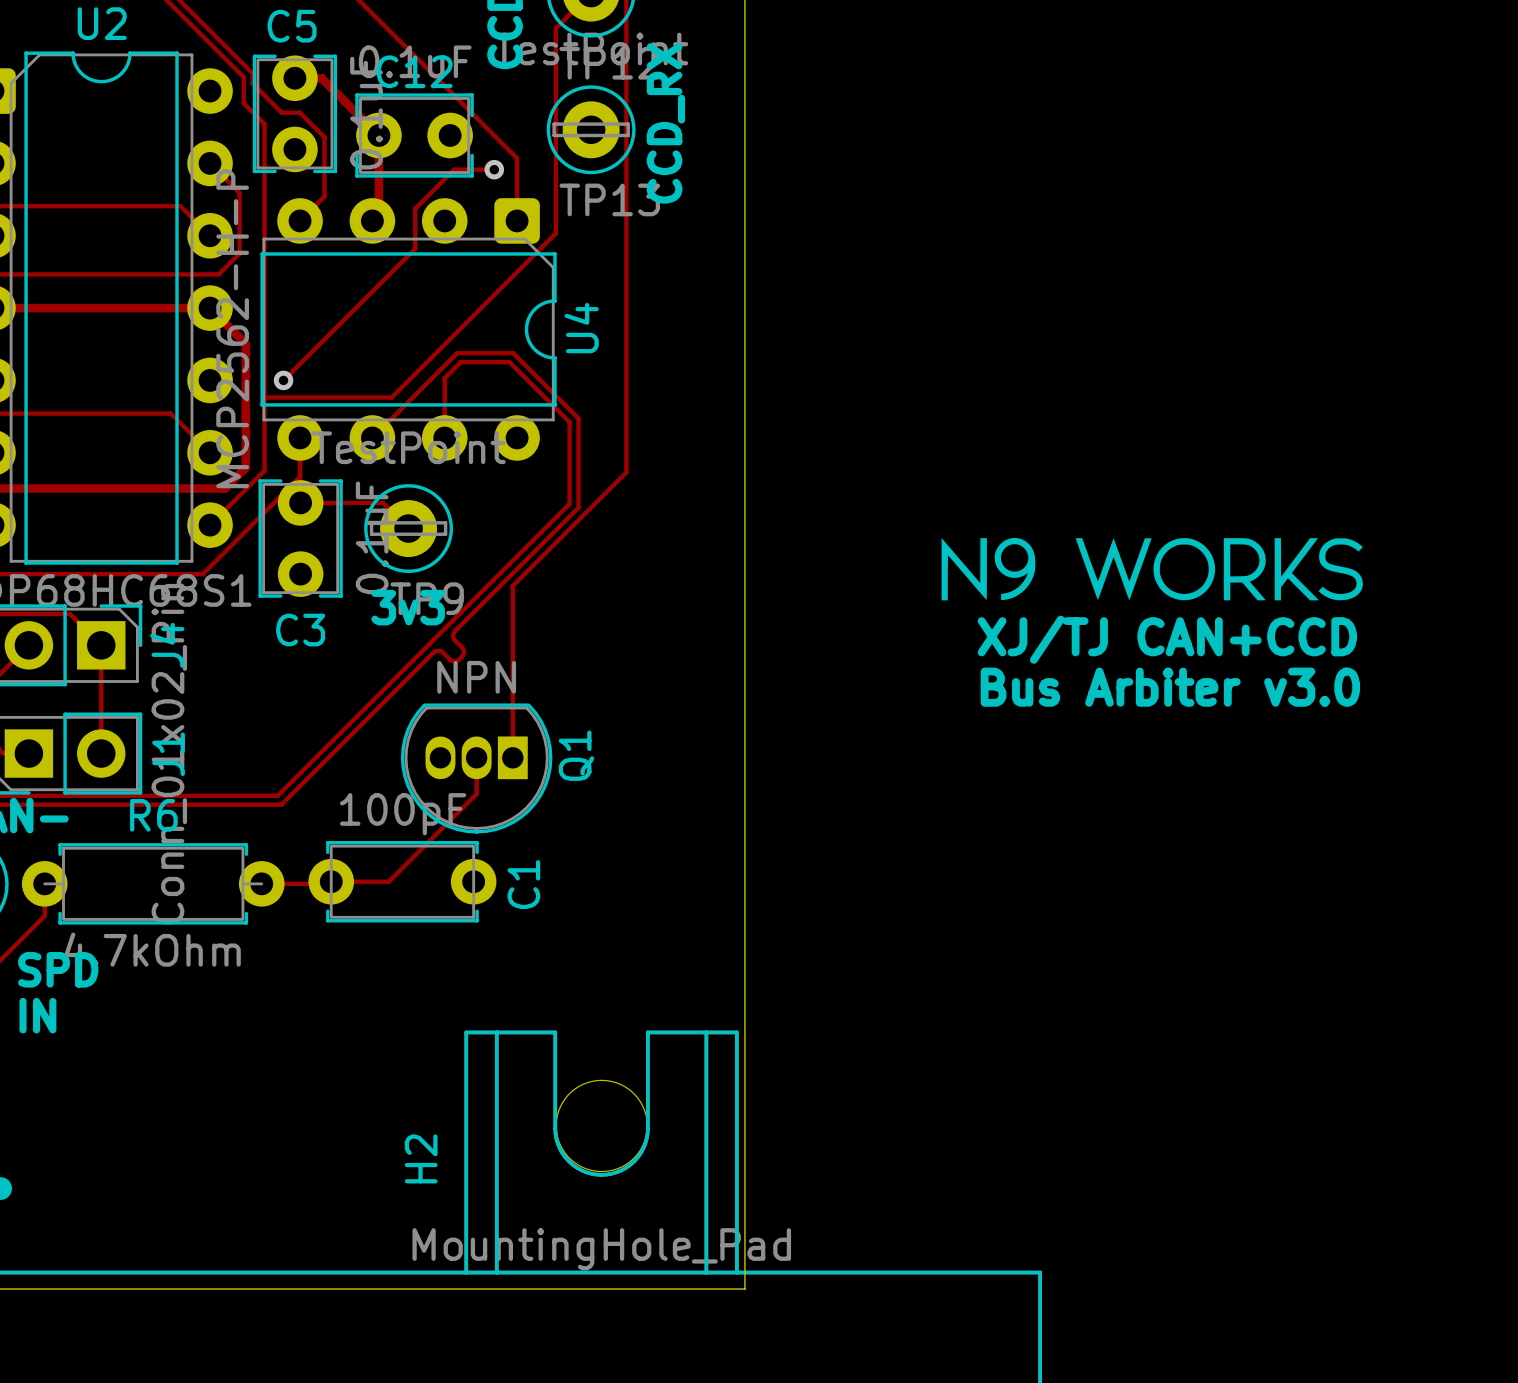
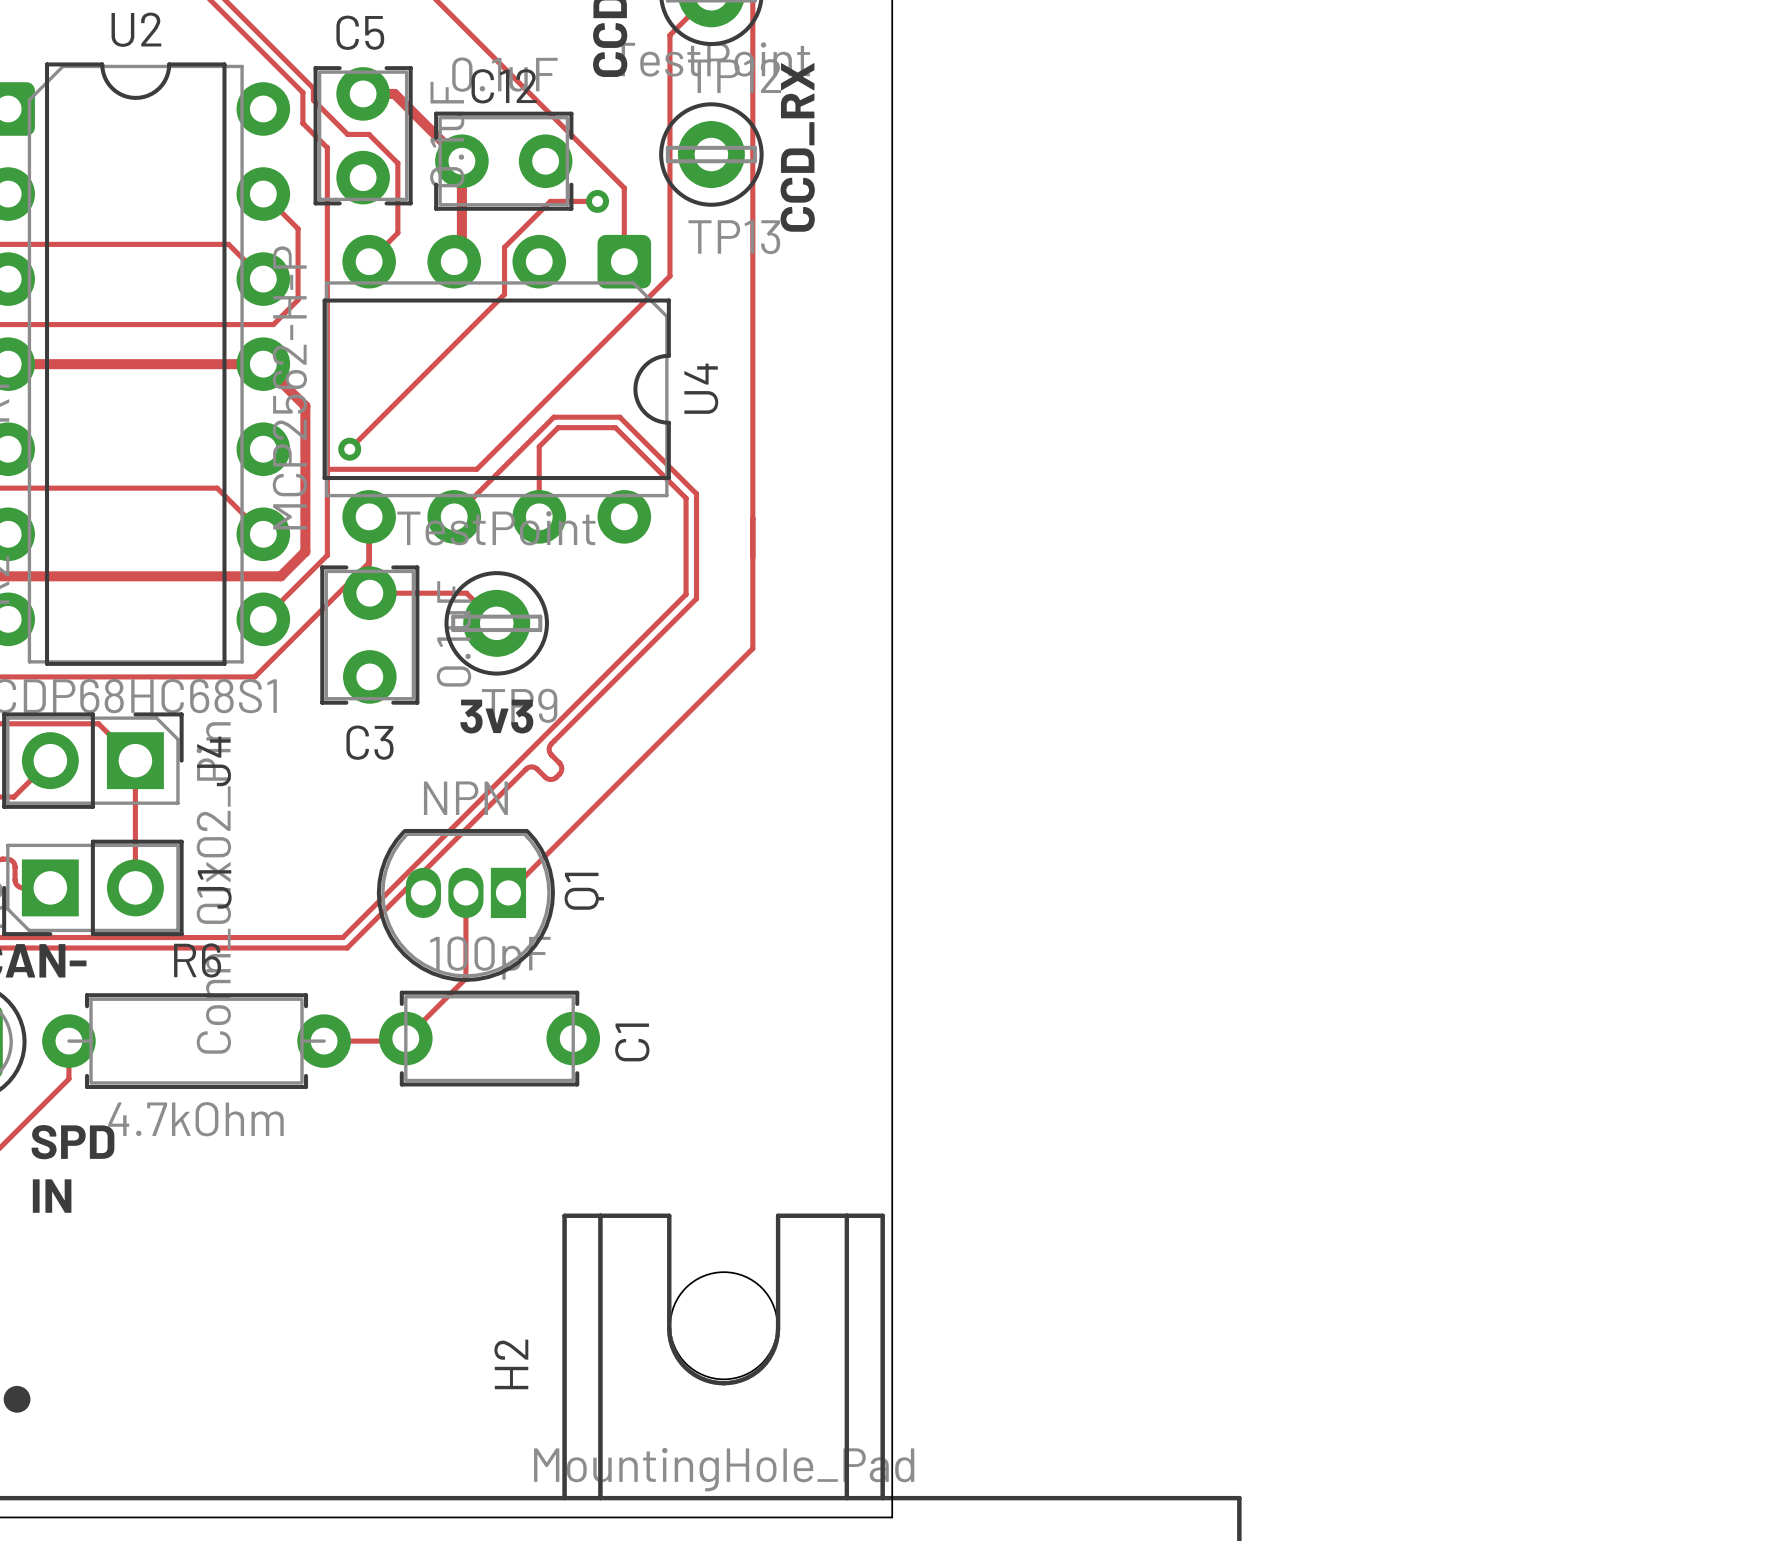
track: (626, 472) (512, 585) (512, 757) -> (752, 557) (752, 648) (508, 892)
drawing: [941, 537, 1363, 601] -> none
text: XJ/TJ CAN+CCD (1167, 639) -> none
text: Bus Arbiter v3.0 (1170, 687) -> none
track: (476, 757) (476, 794) (388, 881) (331, 881) -> (465, 892) (465, 978) (405, 1038)
Q1 position: (476, 768) -> (465, 905)

